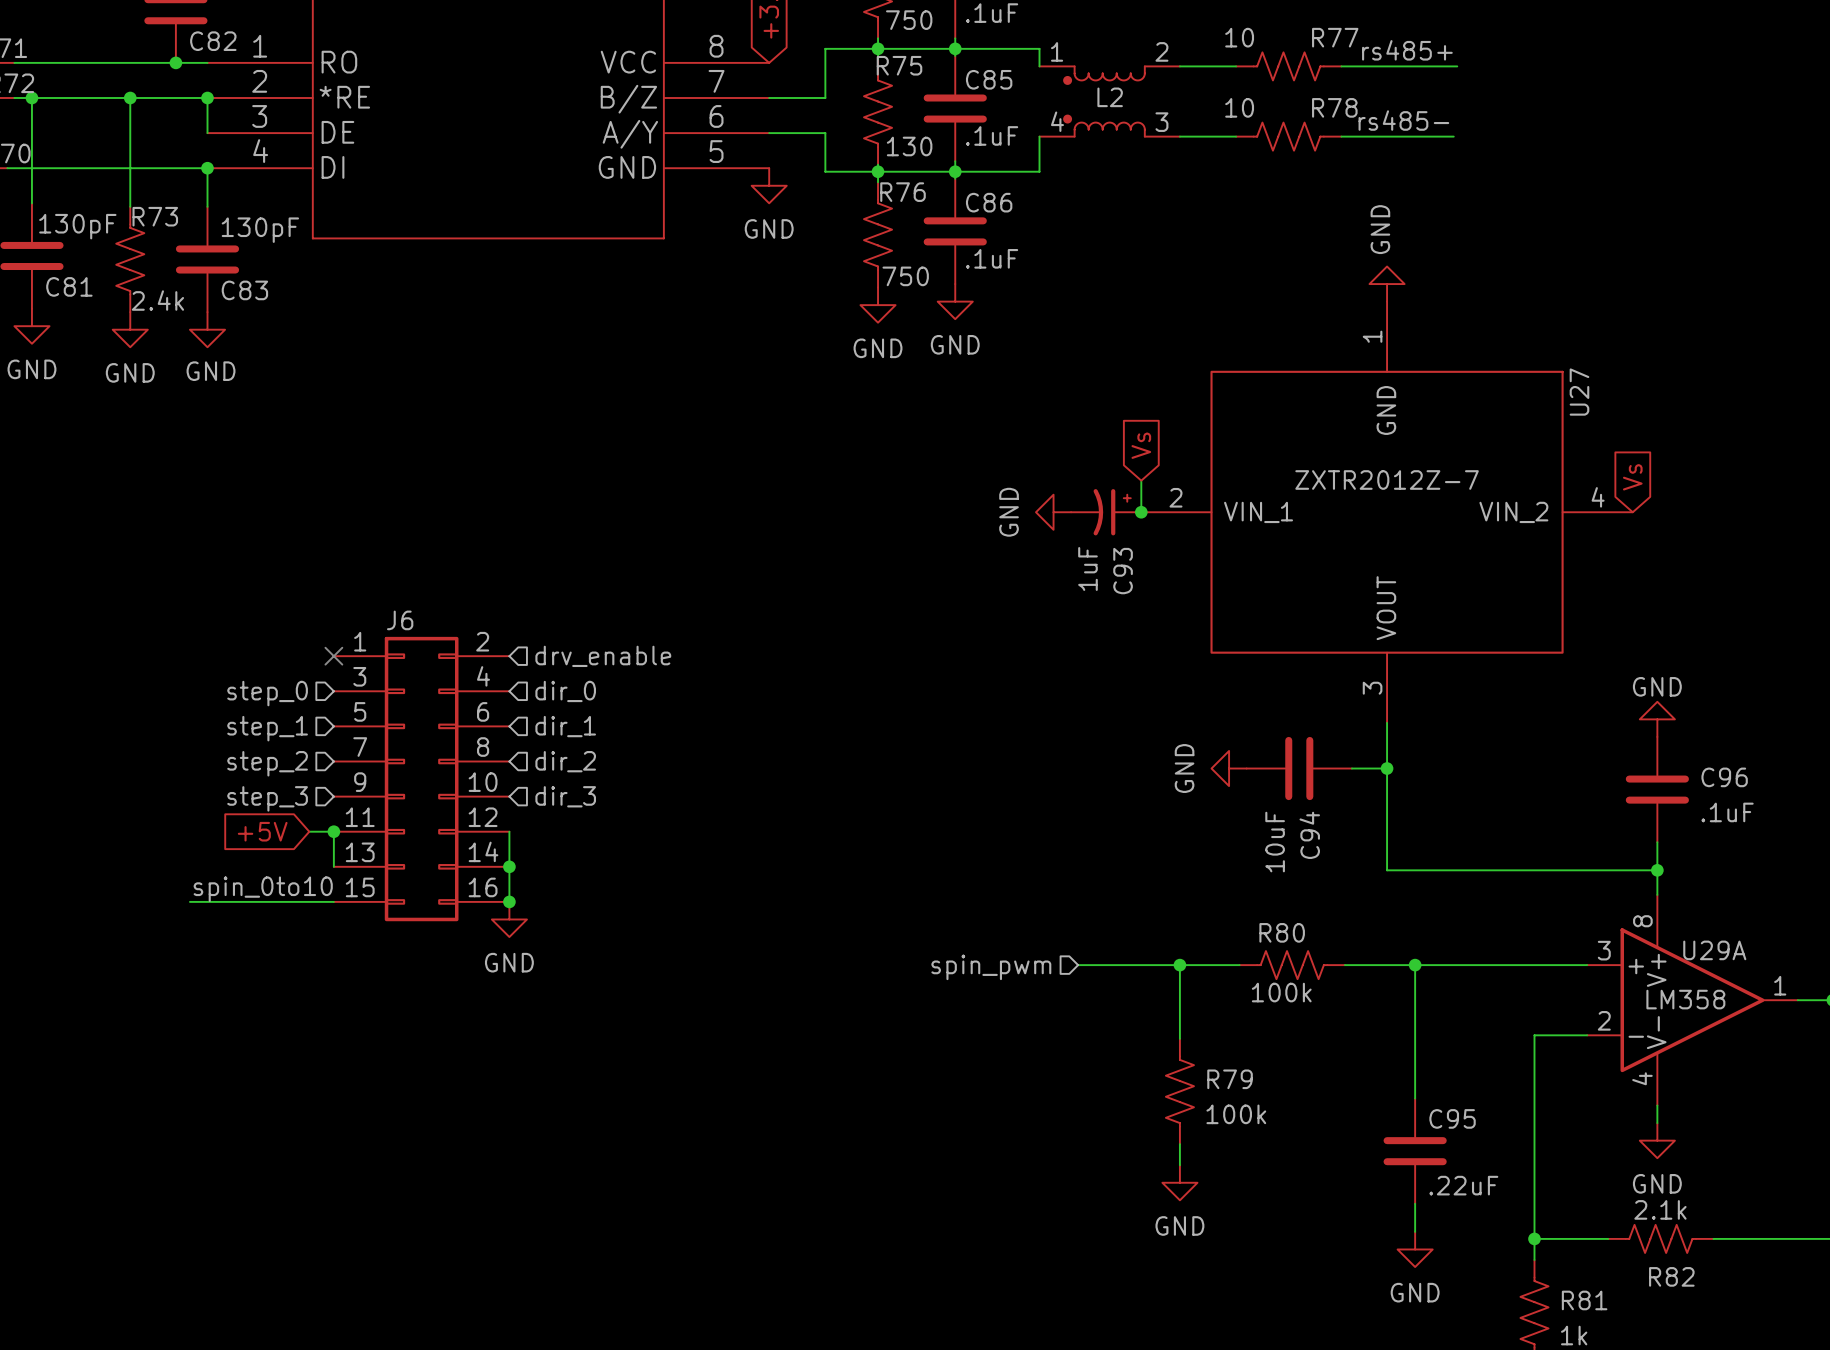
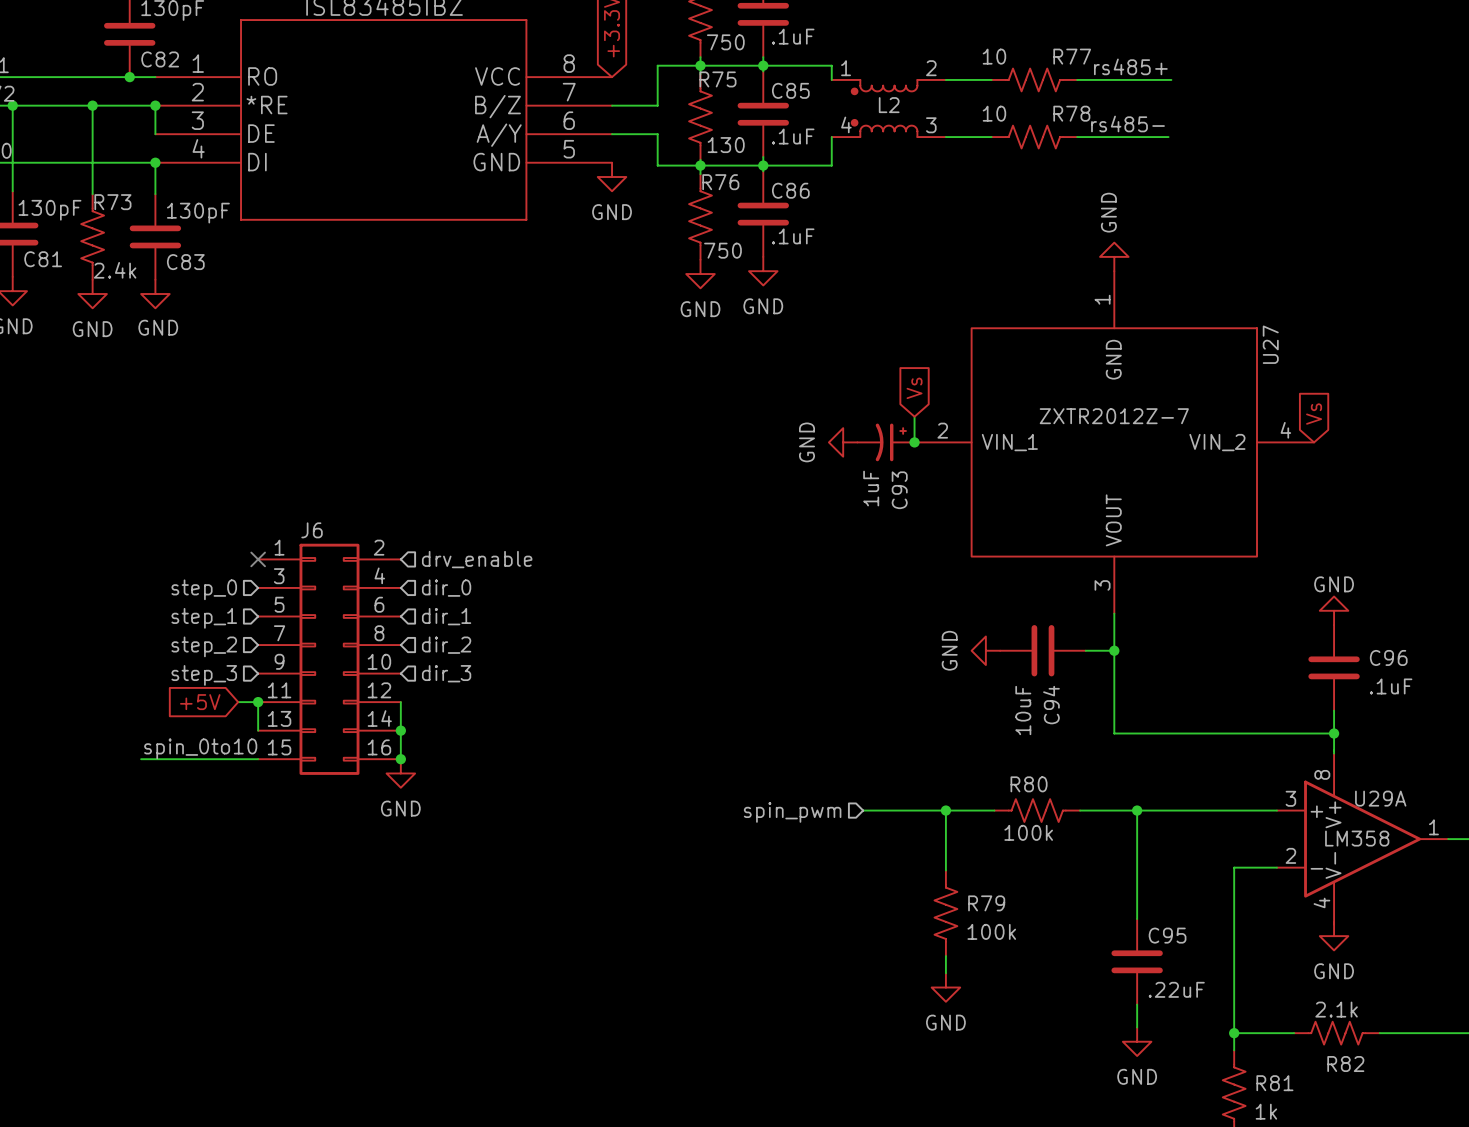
power symbol position: GND (1657, 1140) -> GND (1334, 936)

